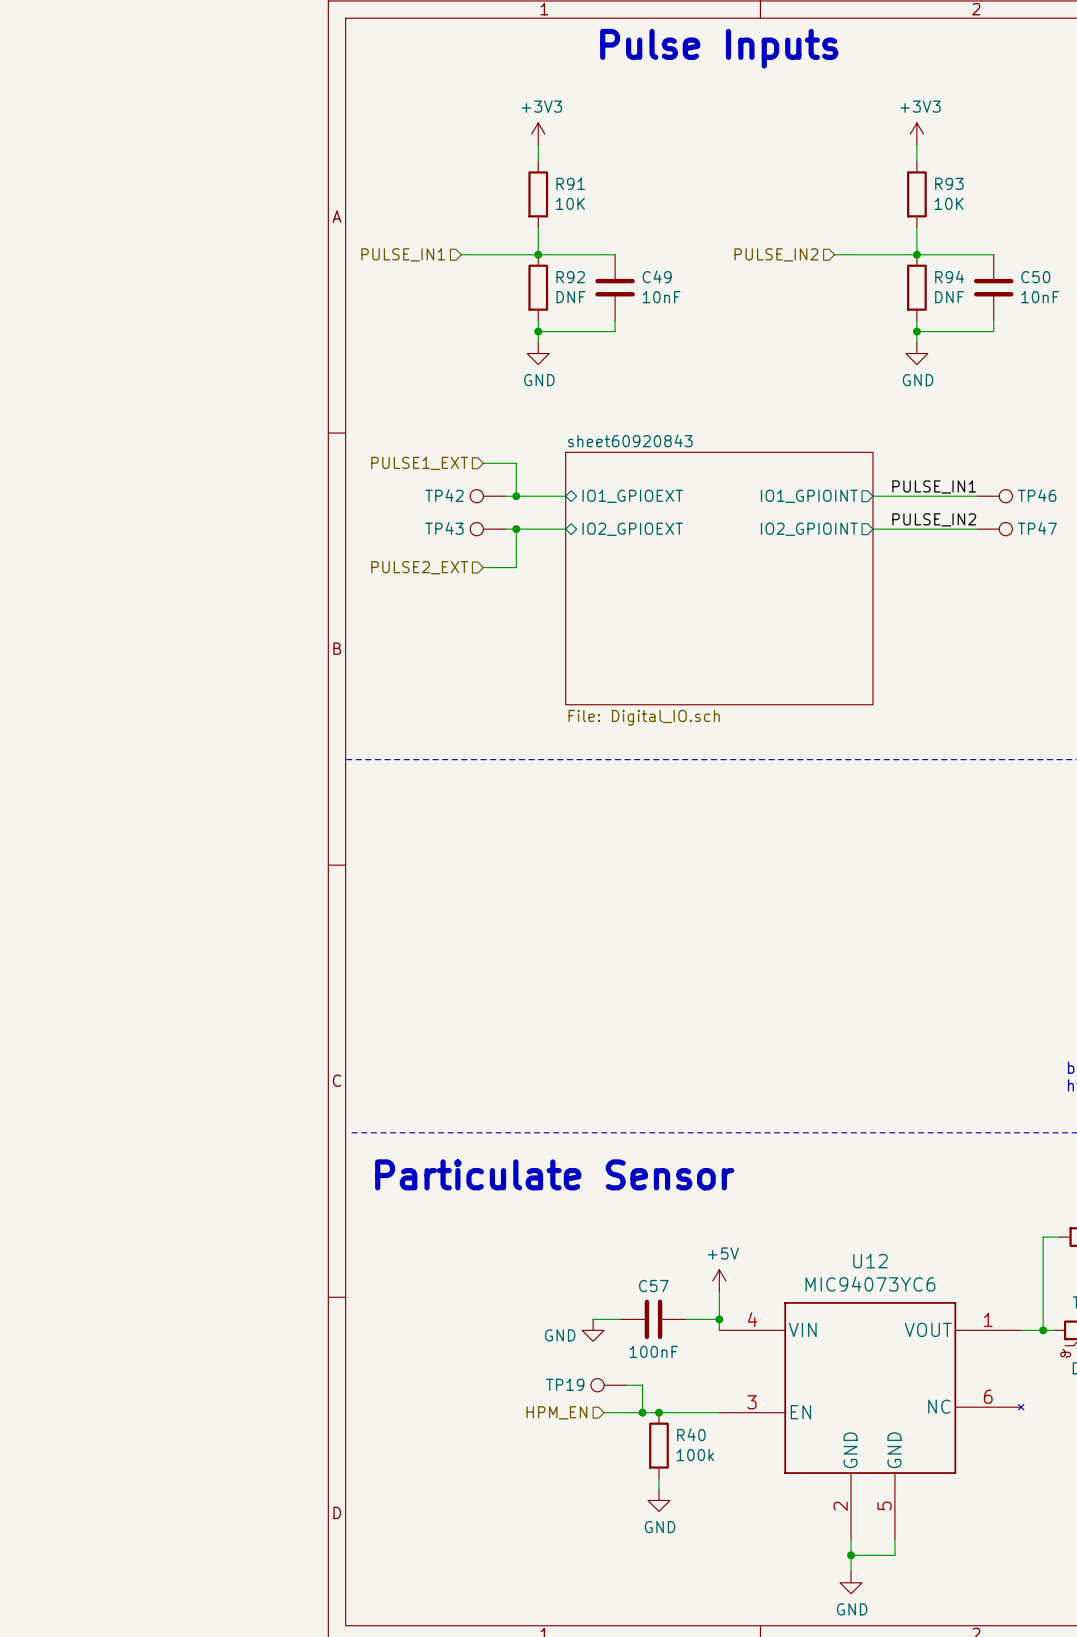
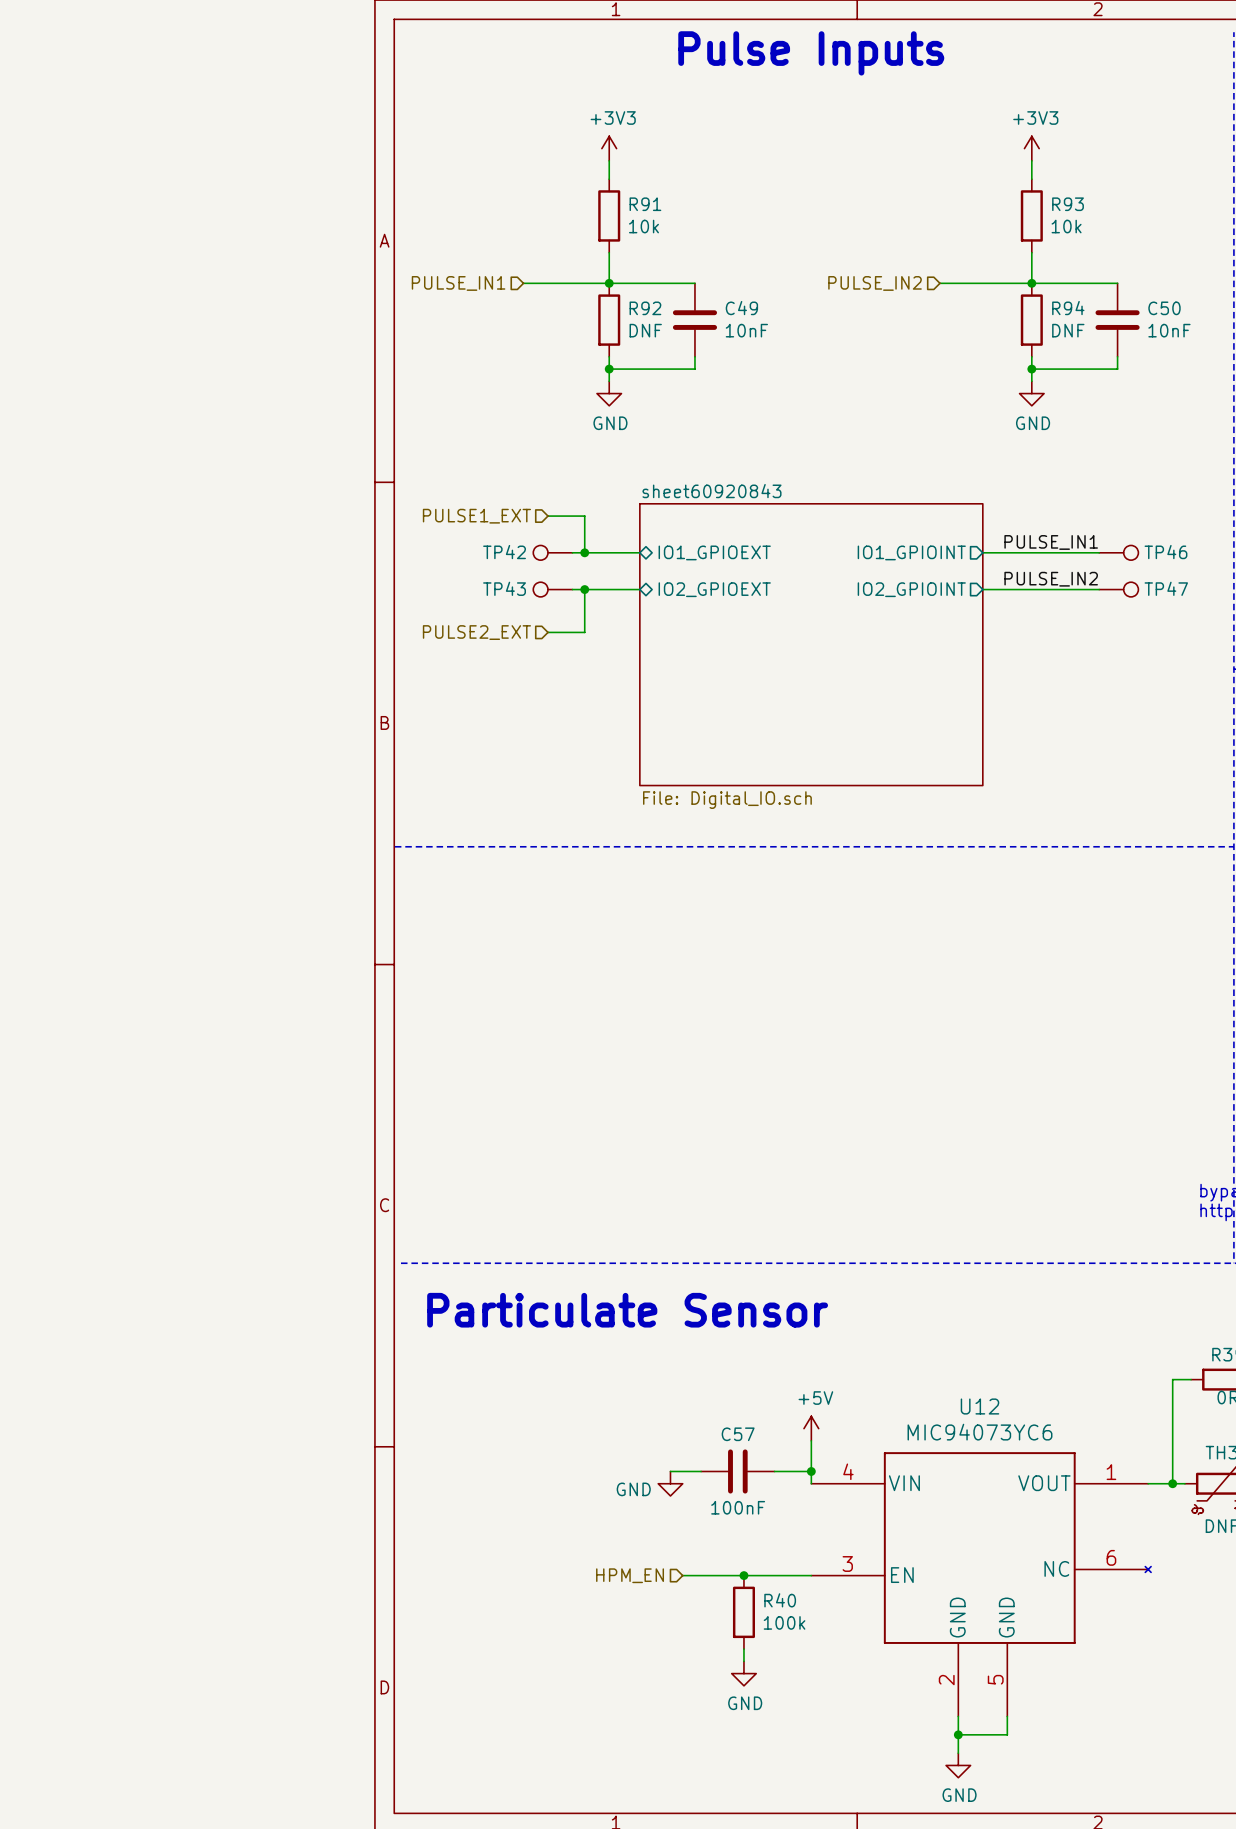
R91 value: 10K (570, 203) -> 10k (643, 226)
R93 value: 10K (949, 203) -> 10k (1066, 226)
TP19: (608, 1385) -> none
wire: (626, 1385) (642, 1385) (642, 1412) -> none
junction: (642, 1412) -> none

